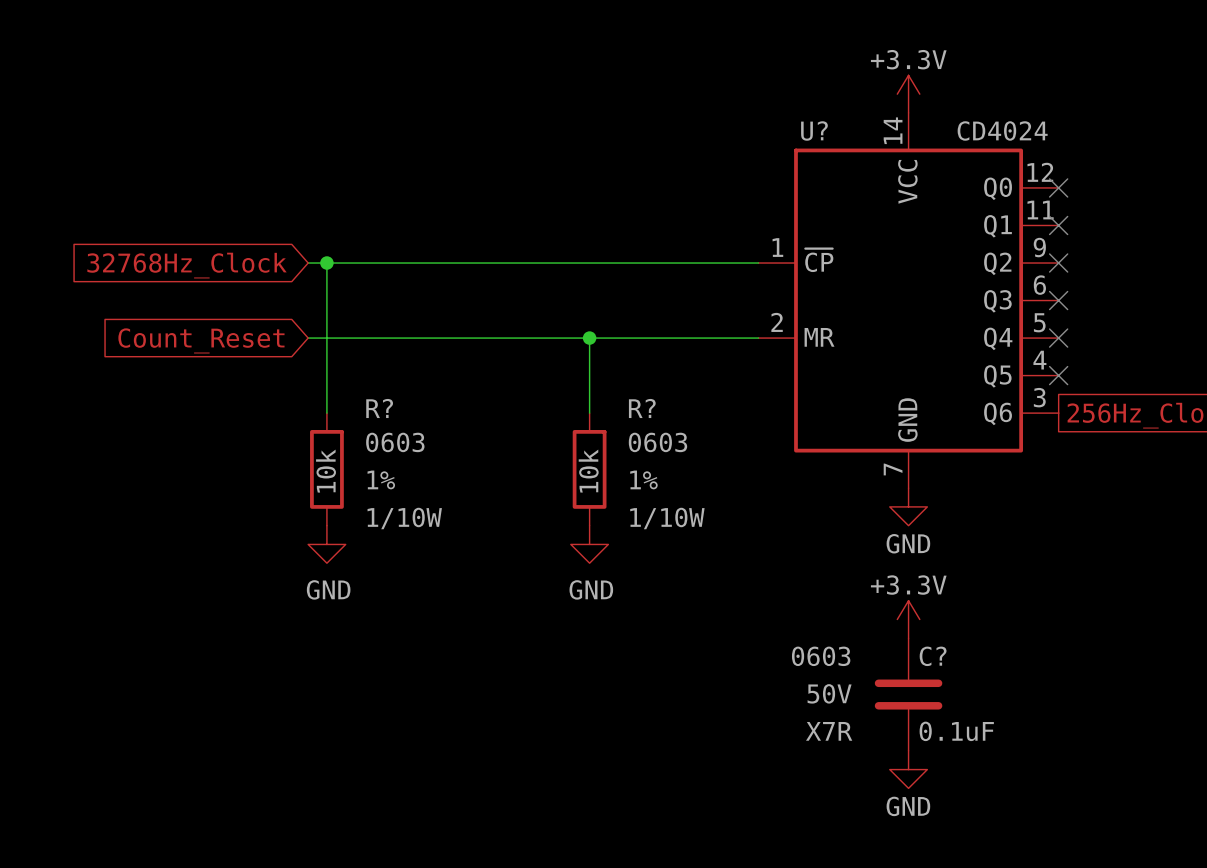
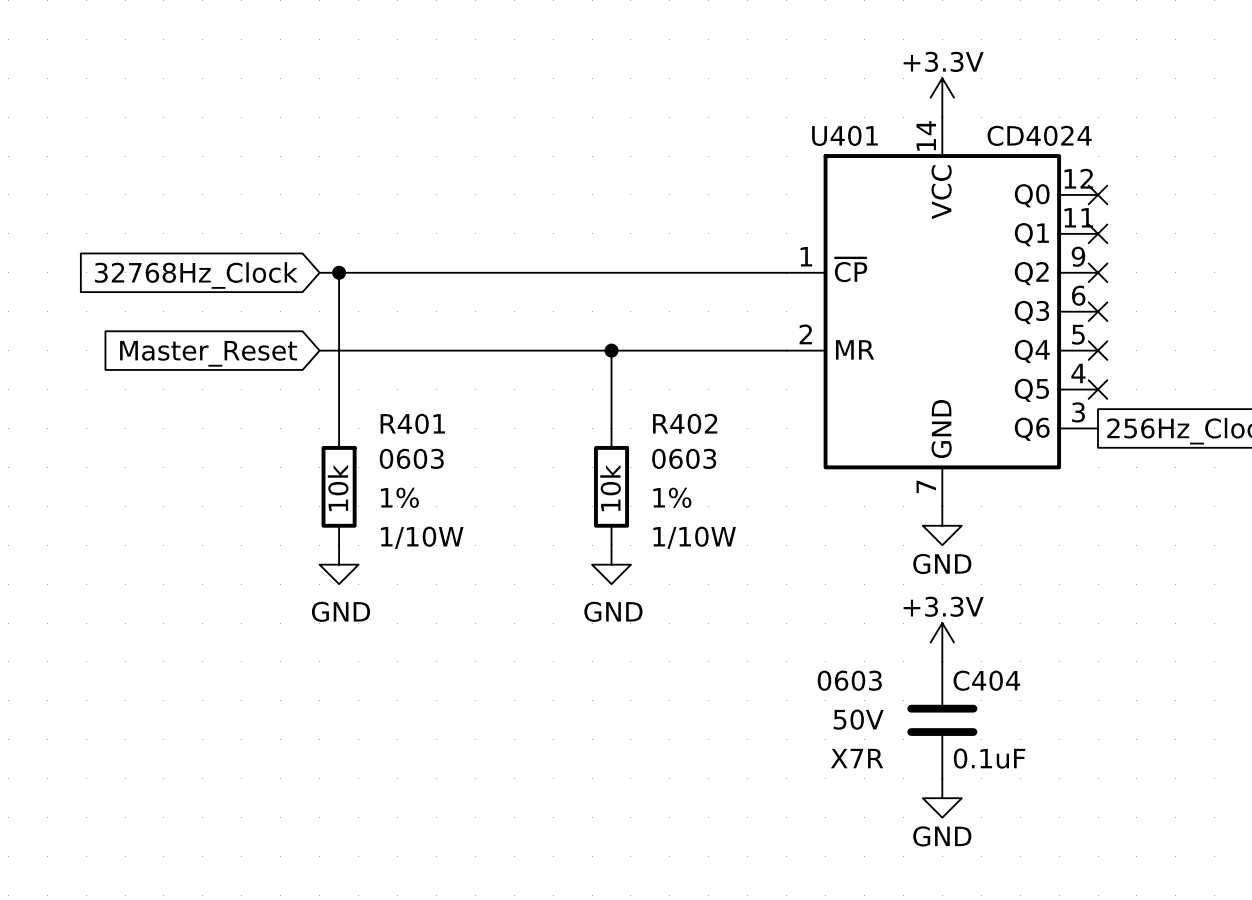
U? name: U? (814, 130) -> U401 (844, 135)
global label: Count_Reset (201, 340) -> Master_Reset (208, 353)
R? name: R? (379, 408) -> R401 (412, 423)
R? name: R? (642, 408) -> R402 (685, 423)
C? name: C? (933, 656) -> C404 (986, 680)

